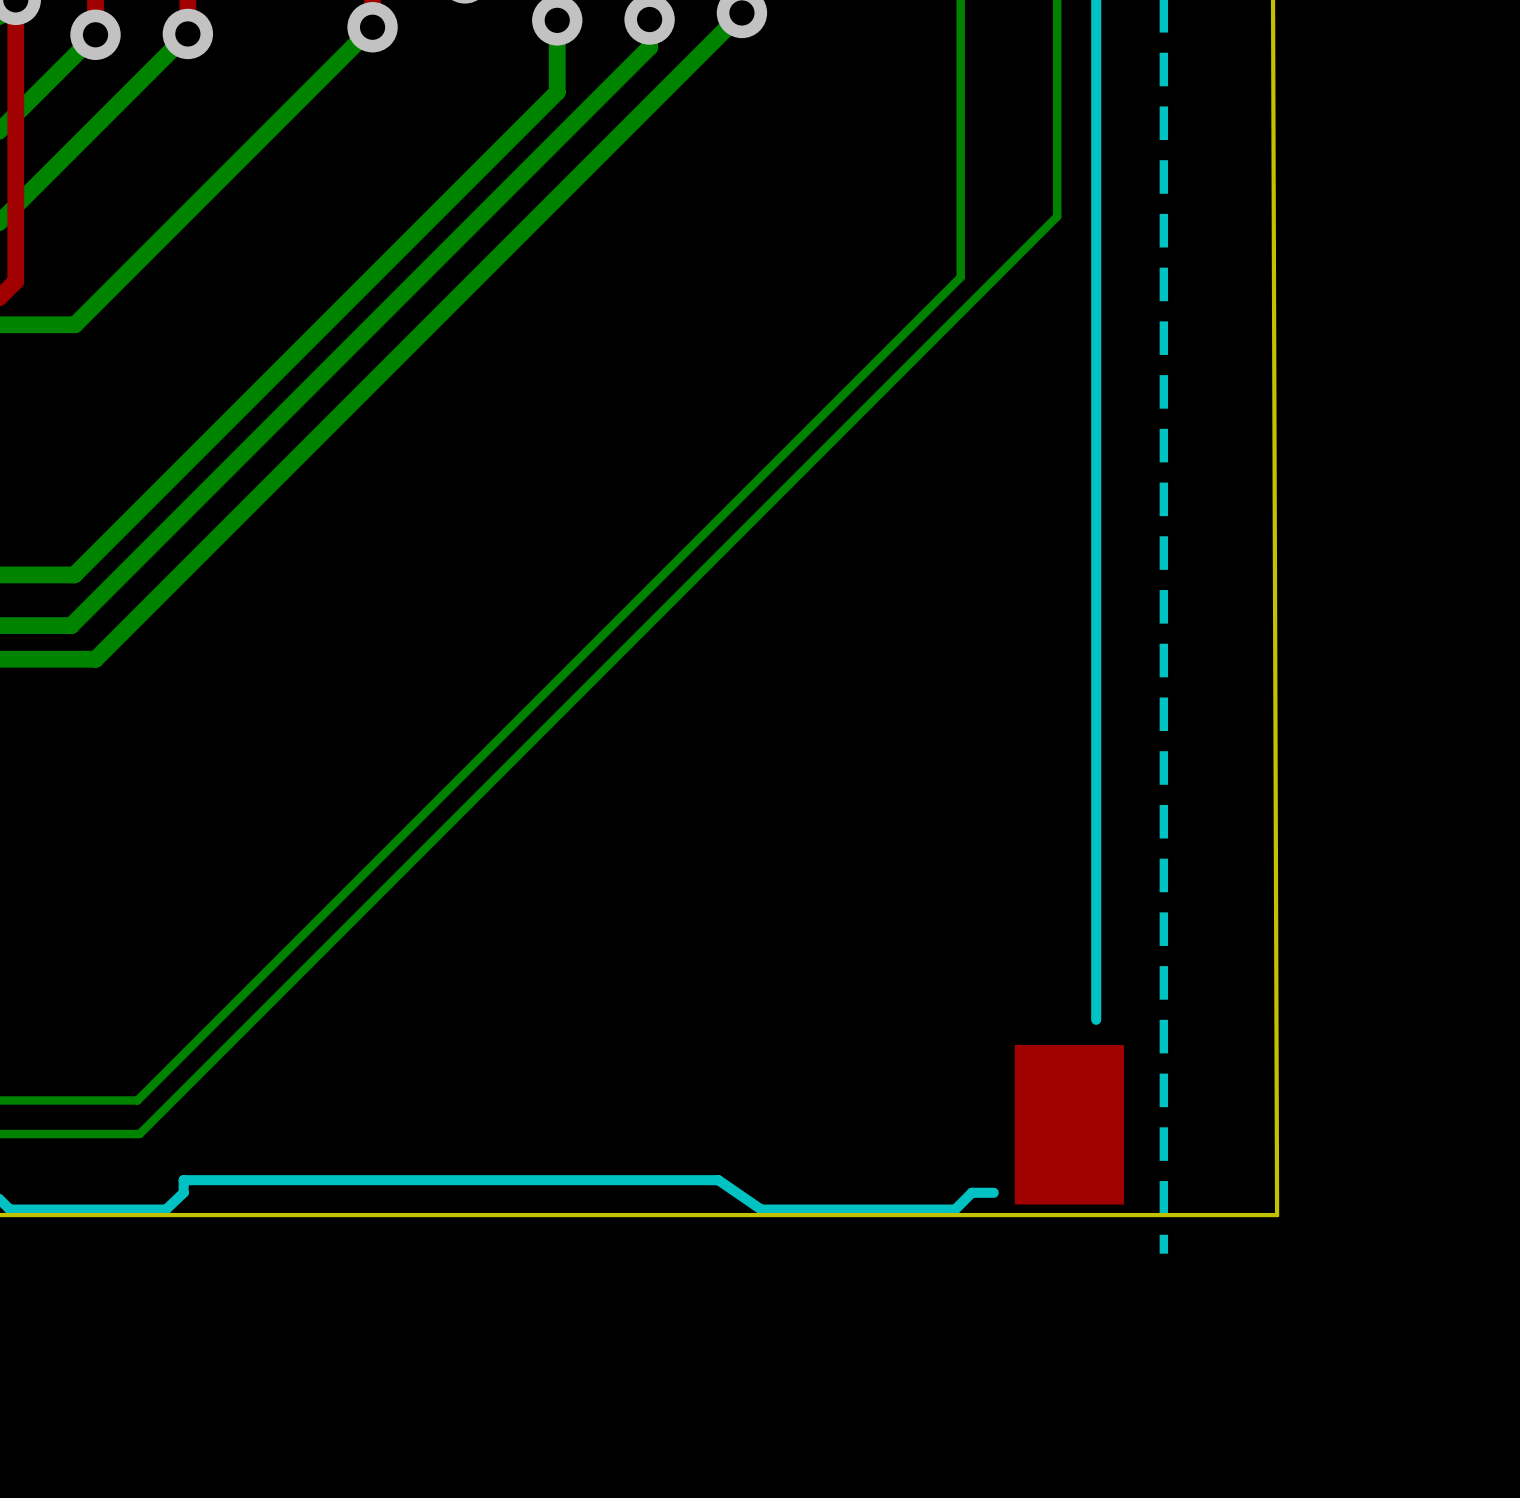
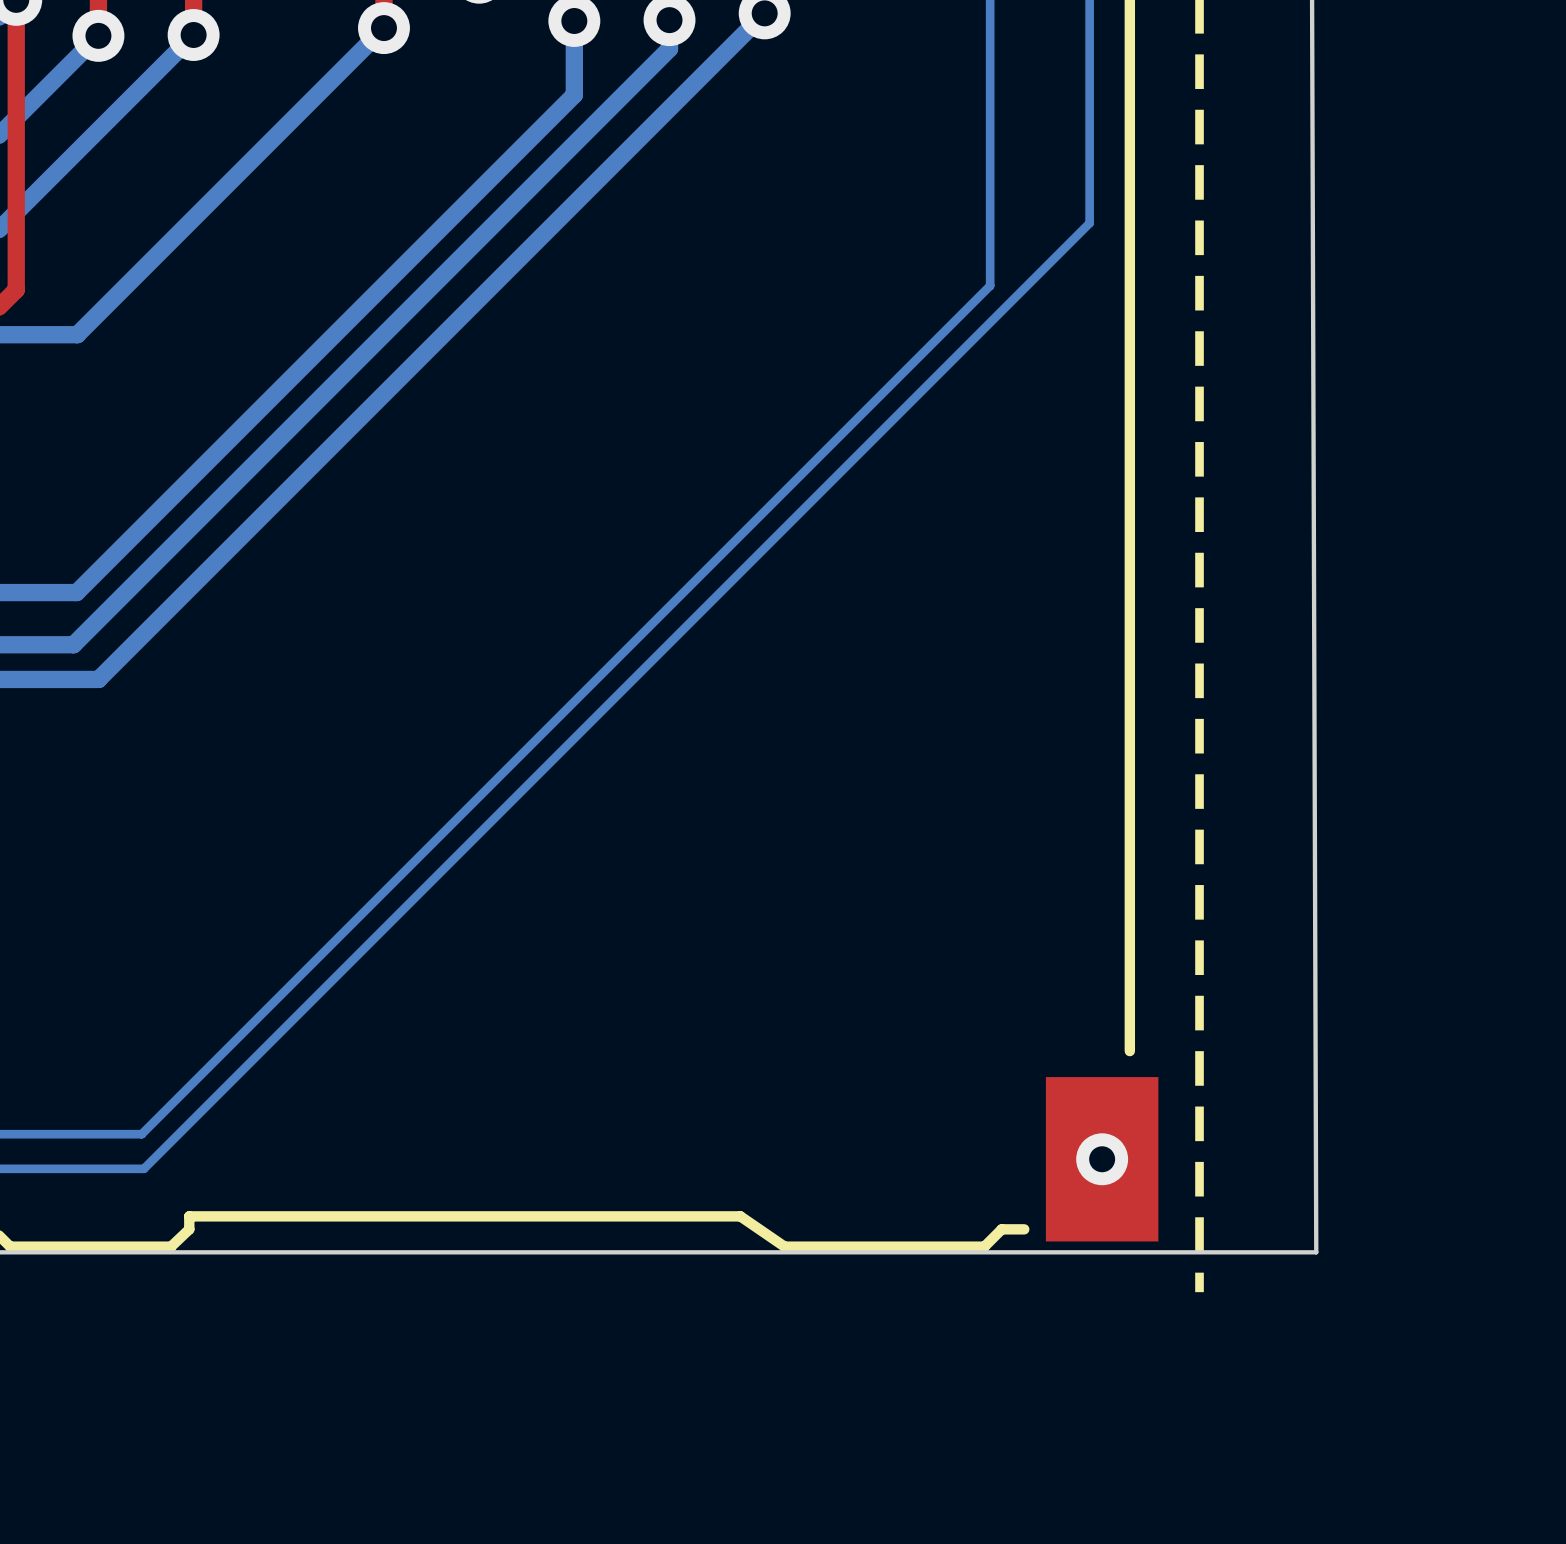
via: none -> (1102, 1159)

